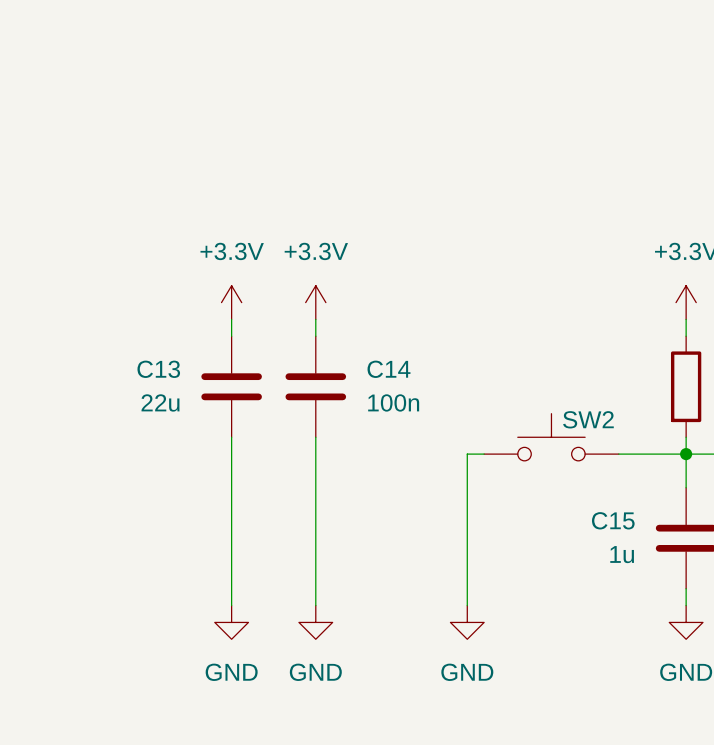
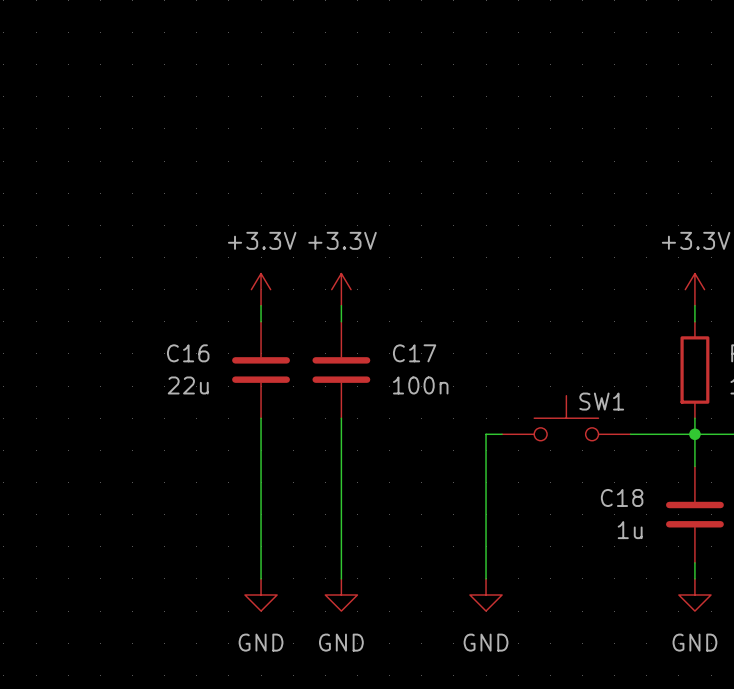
C13 name: C13 (158, 369) -> C16 (188, 353)
C14 name: C14 (389, 369) -> C17 (414, 353)
SW2 name: SW2 (588, 419) -> SW1 (601, 401)
C15 name: C15 (613, 520) -> C18 (622, 497)

